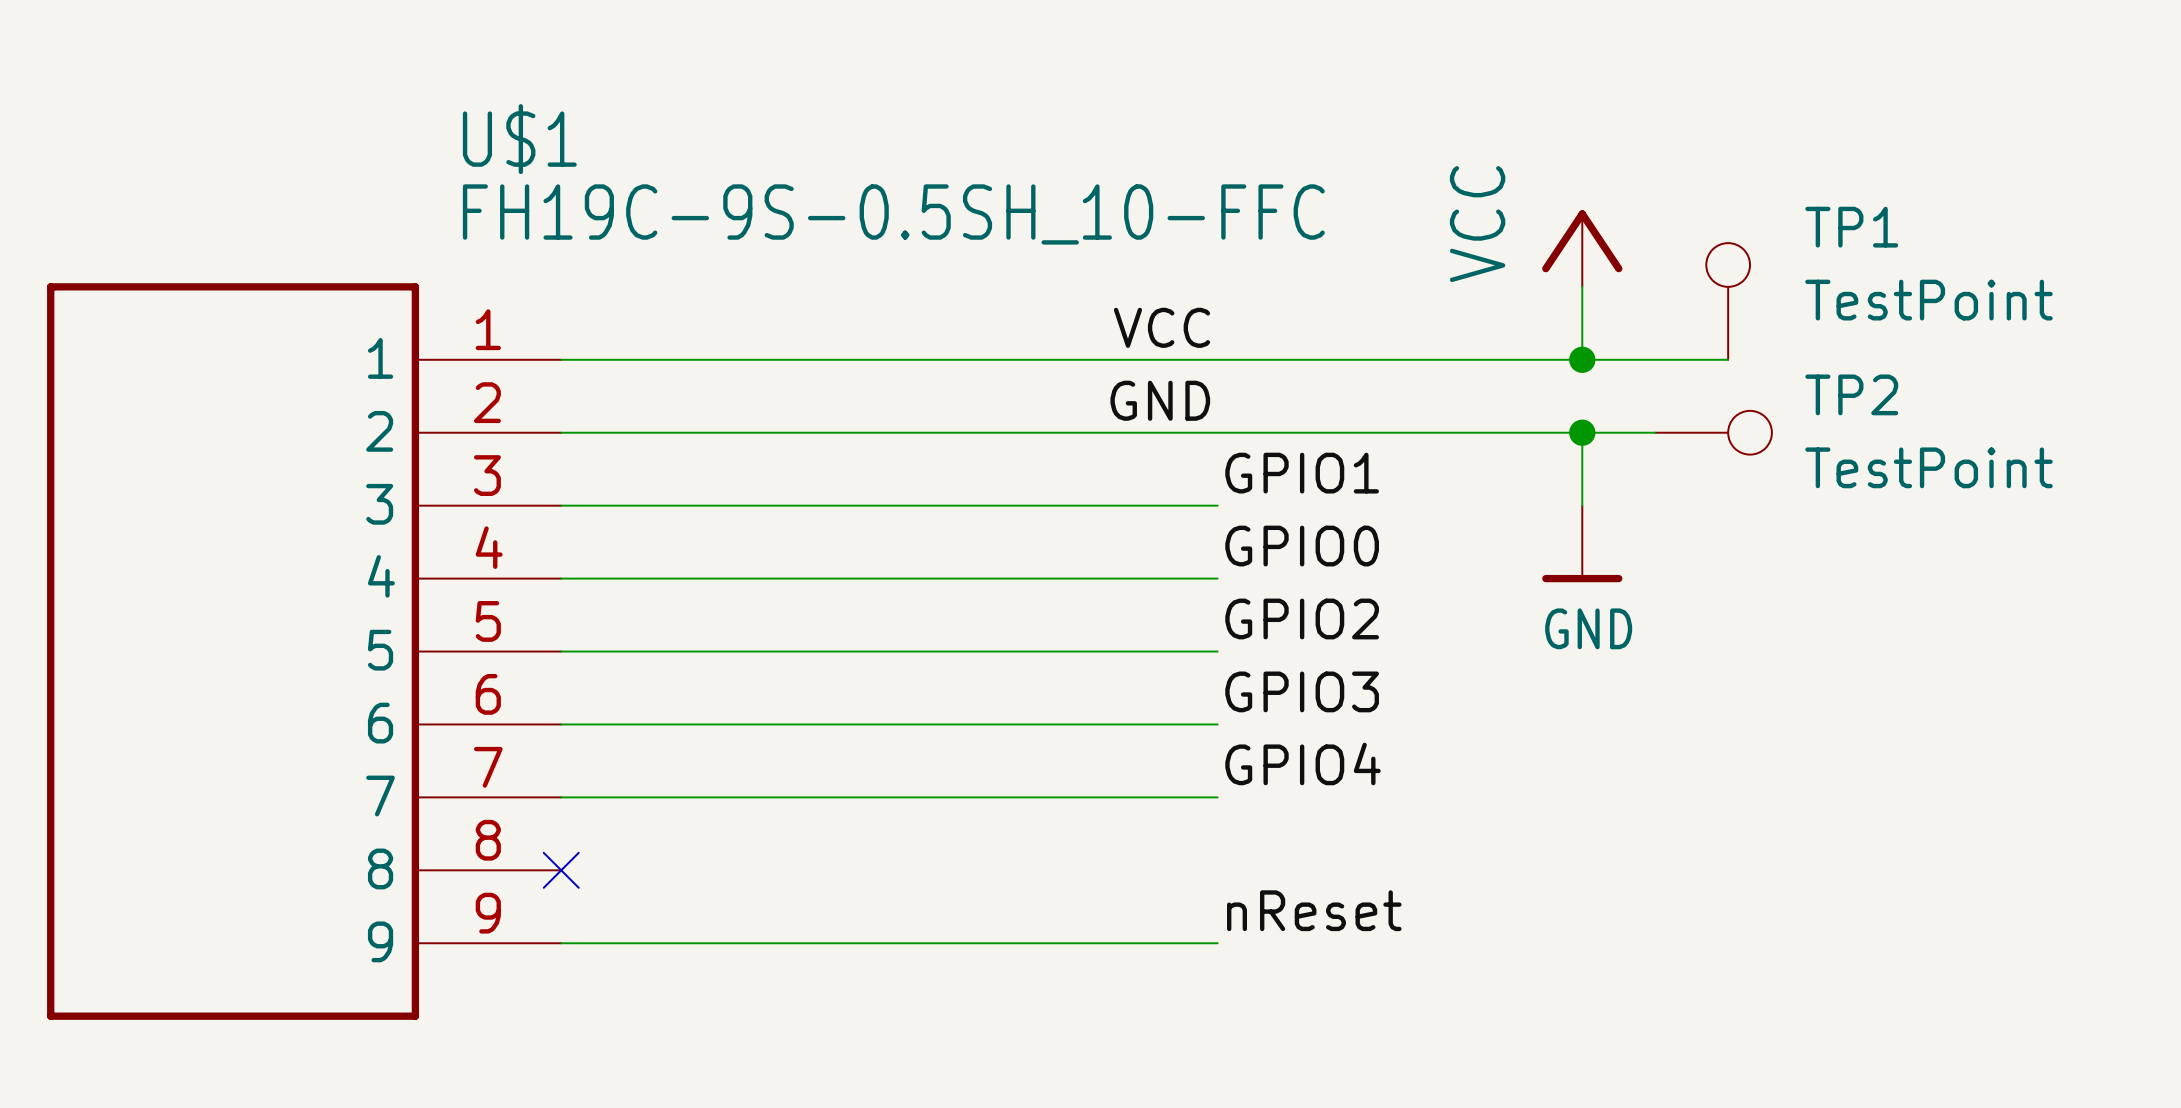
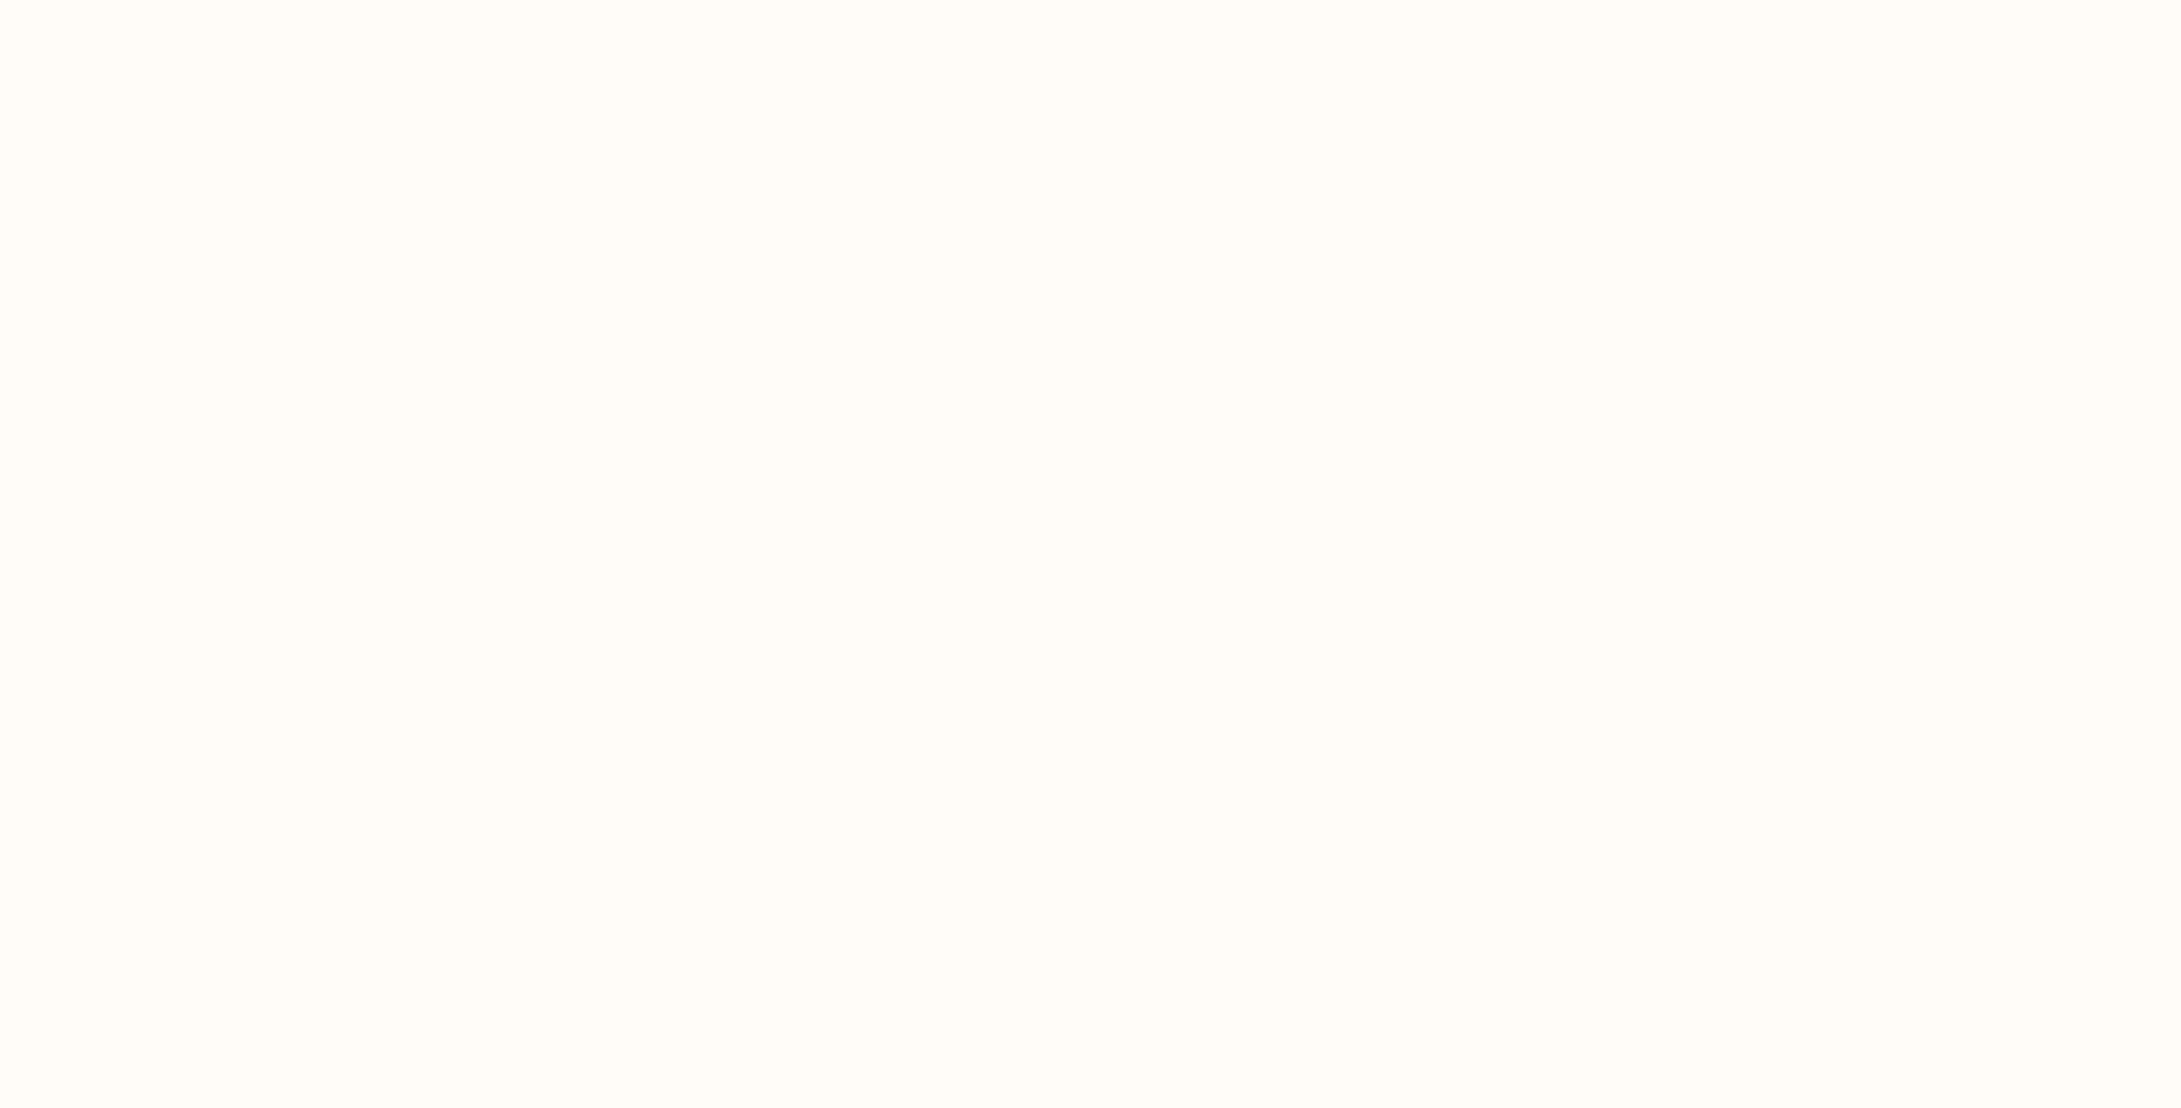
power symbol: VCC (1582, 248) -> none
wire: (1582, 286) (1582, 359) -> none
TP1: TestPoint (1728, 301) -> none
label: VCC (1162, 327) -> none
wire: (561, 359) (1728, 359) -> none
junction: (1582, 359) -> none
label: GND (1160, 400) -> none
wire: (561, 432) (1655, 432) -> none
wire: (1582, 432) (1582, 505) -> none
junction: (1582, 432) -> none
TP2: TestPoint (1713, 432) -> none
label: GPIO1 (1302, 473) -> none
wire: (561, 505) (1217, 505) -> none
power symbol: GND (1582, 543) -> none
label: GPIO0 (1302, 546) -> none
wire: (561, 578) (1217, 578) -> none
label: GPIO2 (1302, 618) -> none
U$1: FH19C-9S-0.5SH_10-FFC (304, 651) -> none
wire: (561, 651) (1217, 651) -> none
label: GPIO3 (1302, 691) -> none
wire: (561, 724) (1217, 724) -> none
label: GPIO4 (1302, 763) -> none
wire: (561, 797) (1217, 797) -> none
no-connect mark: (561, 870) -> none
label: nReset (1314, 910) -> none
wire: (561, 943) (1217, 943) -> none

